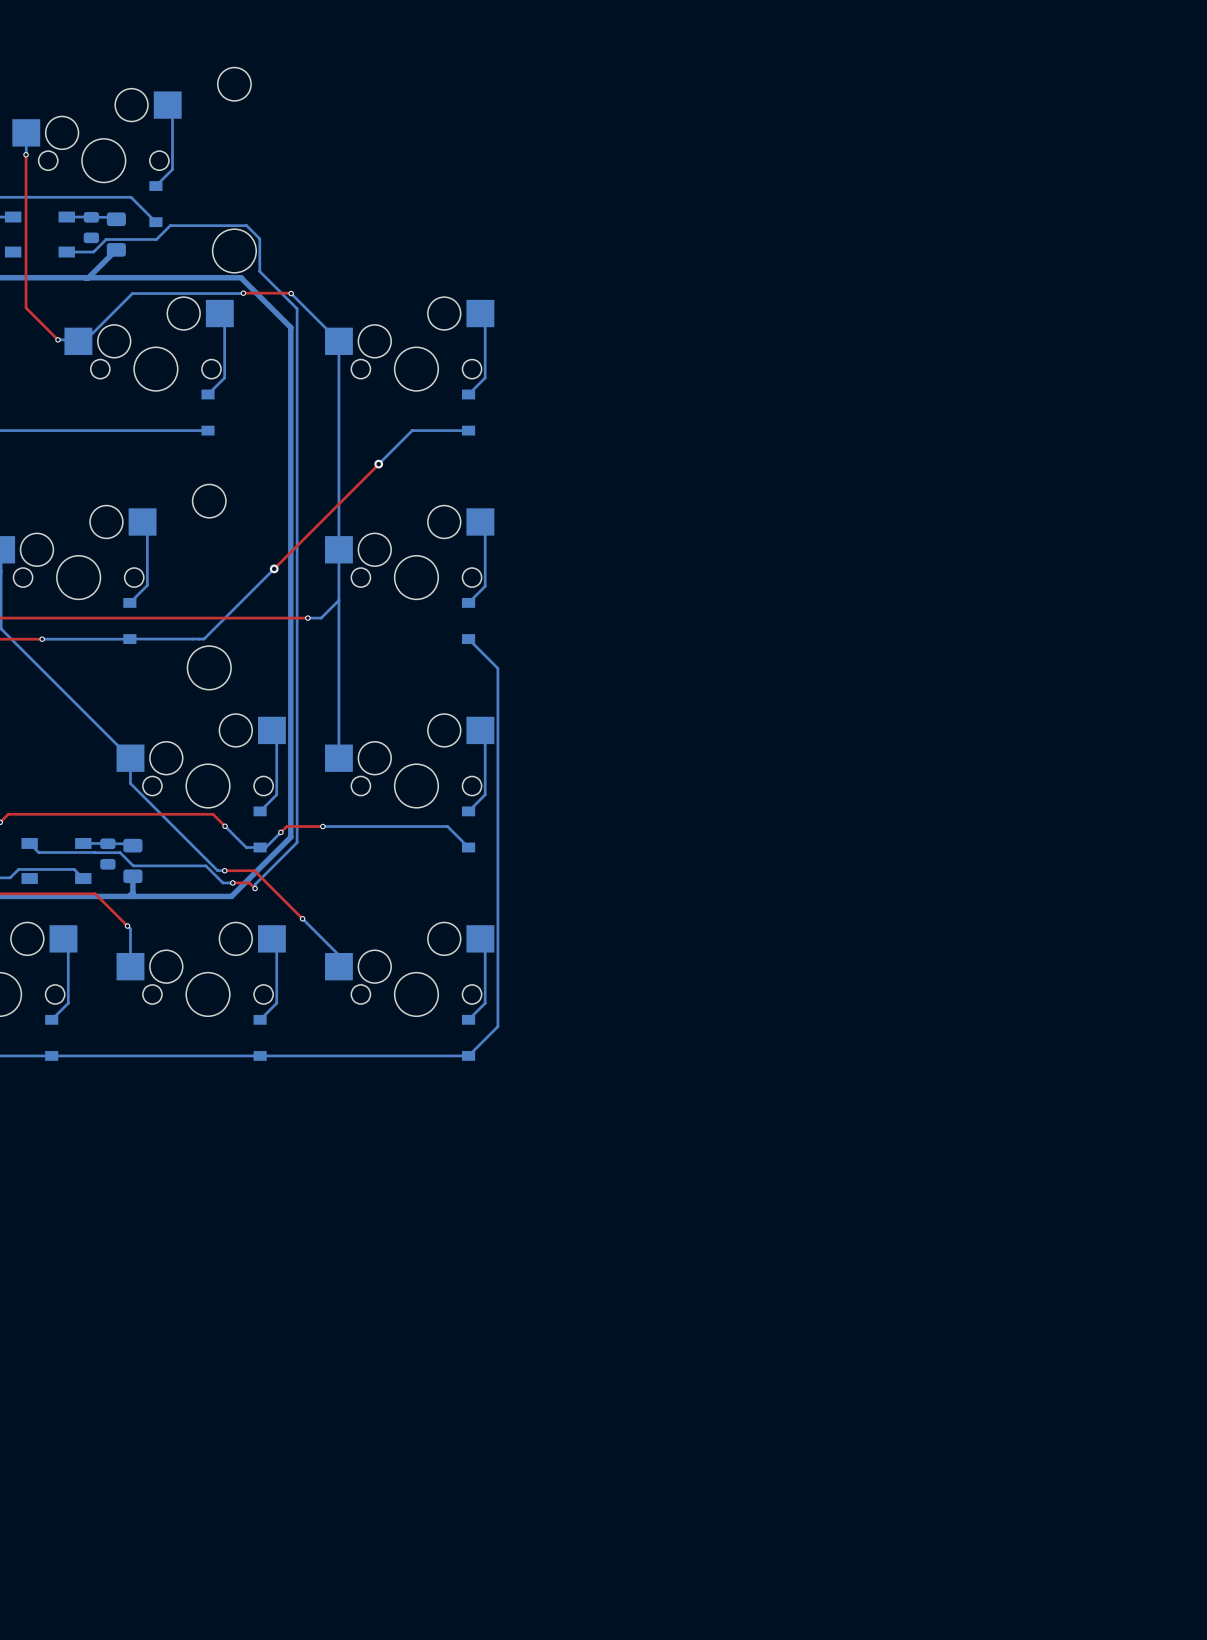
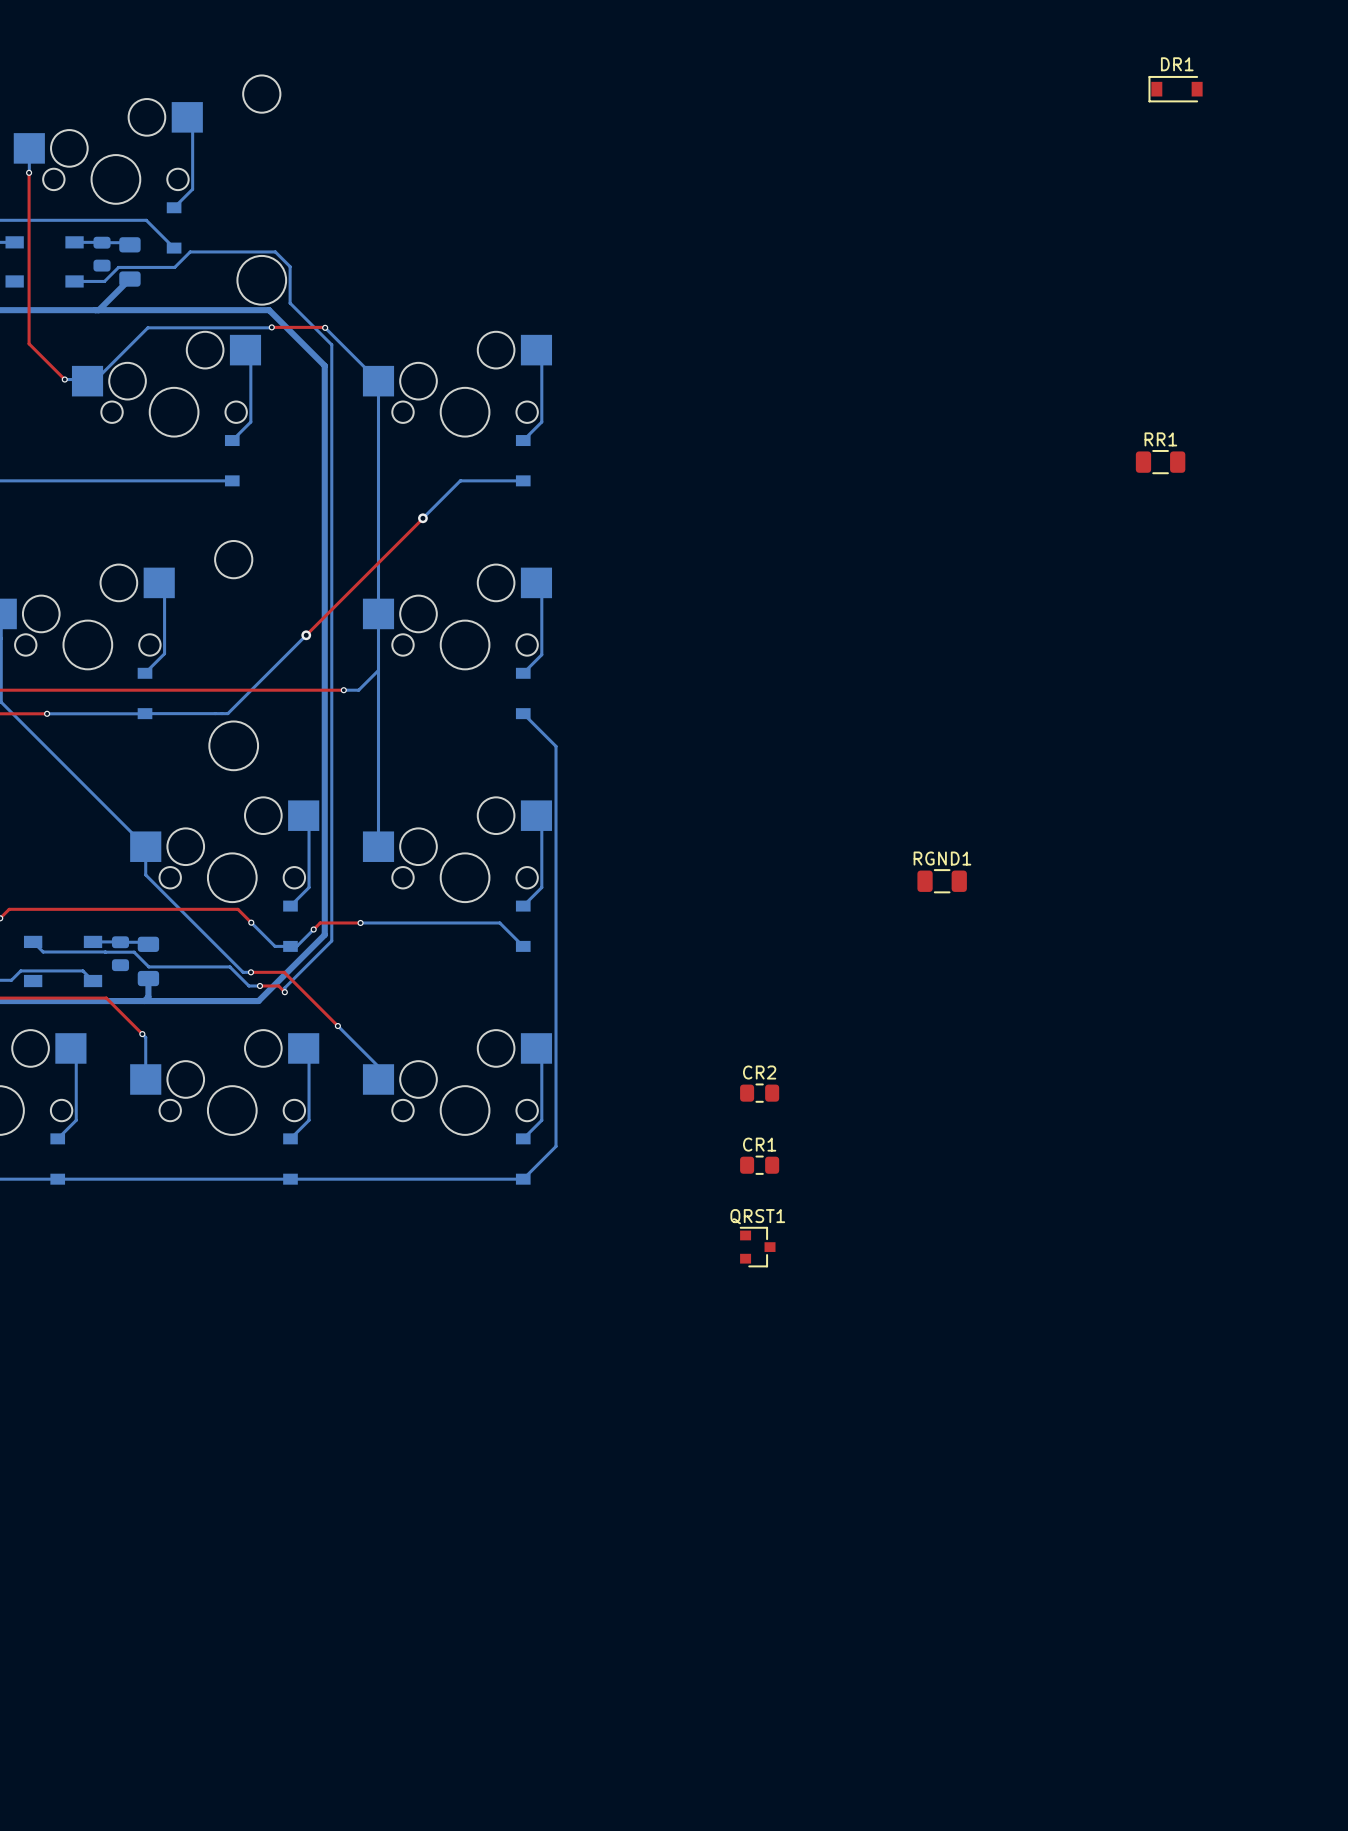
DR1: none -> (1175, 89)
RR1: none -> (1160, 462)
RGND1: none -> (942, 881)
CR2: none -> (759, 1093)
CR1: none -> (759, 1165)
QRST1: none -> (757, 1247)

